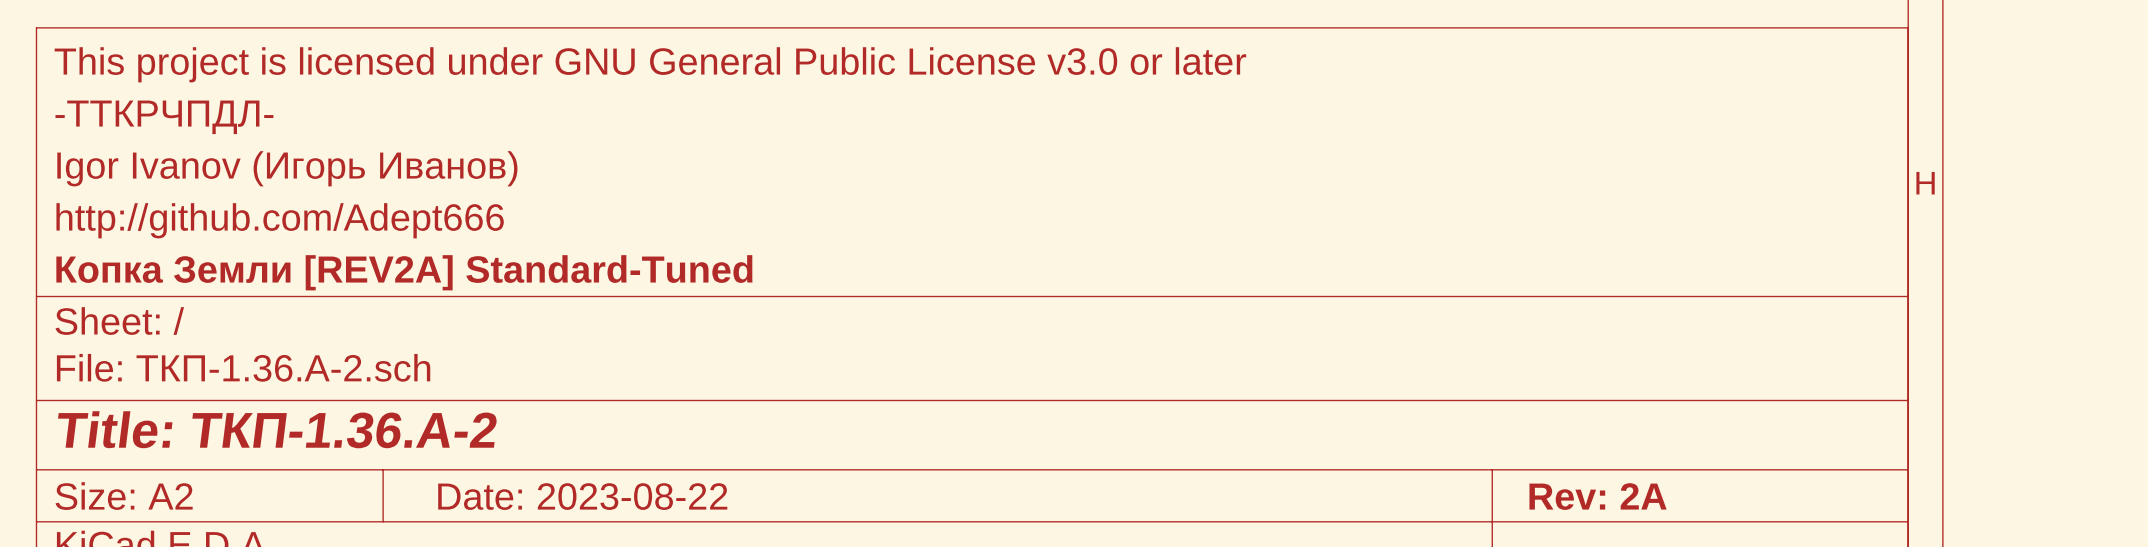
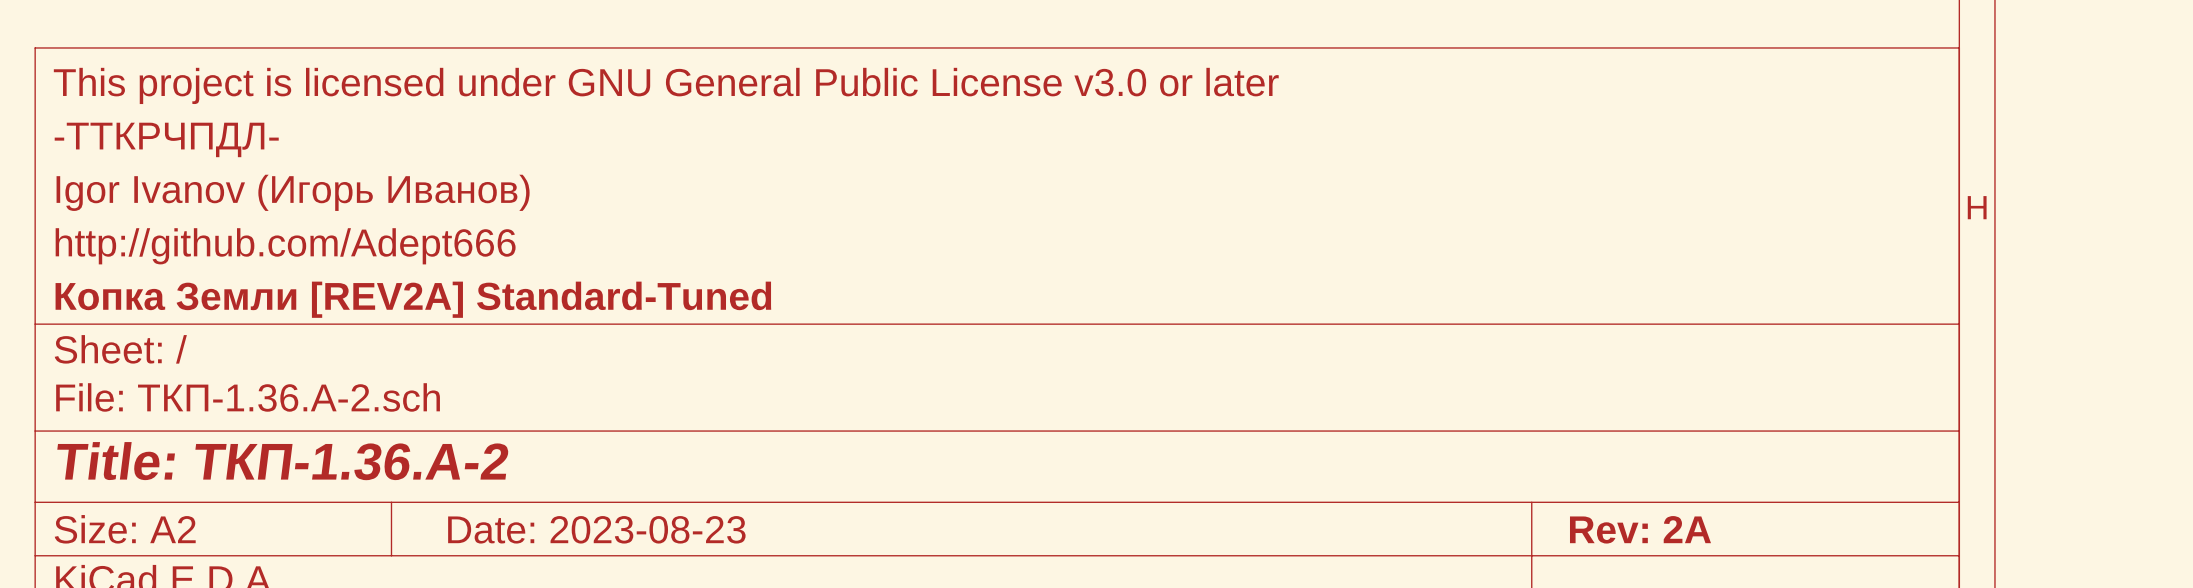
title block: Date: 2023-08-22 (582, 496) -> Date: 2023-08-23 (596, 529)

